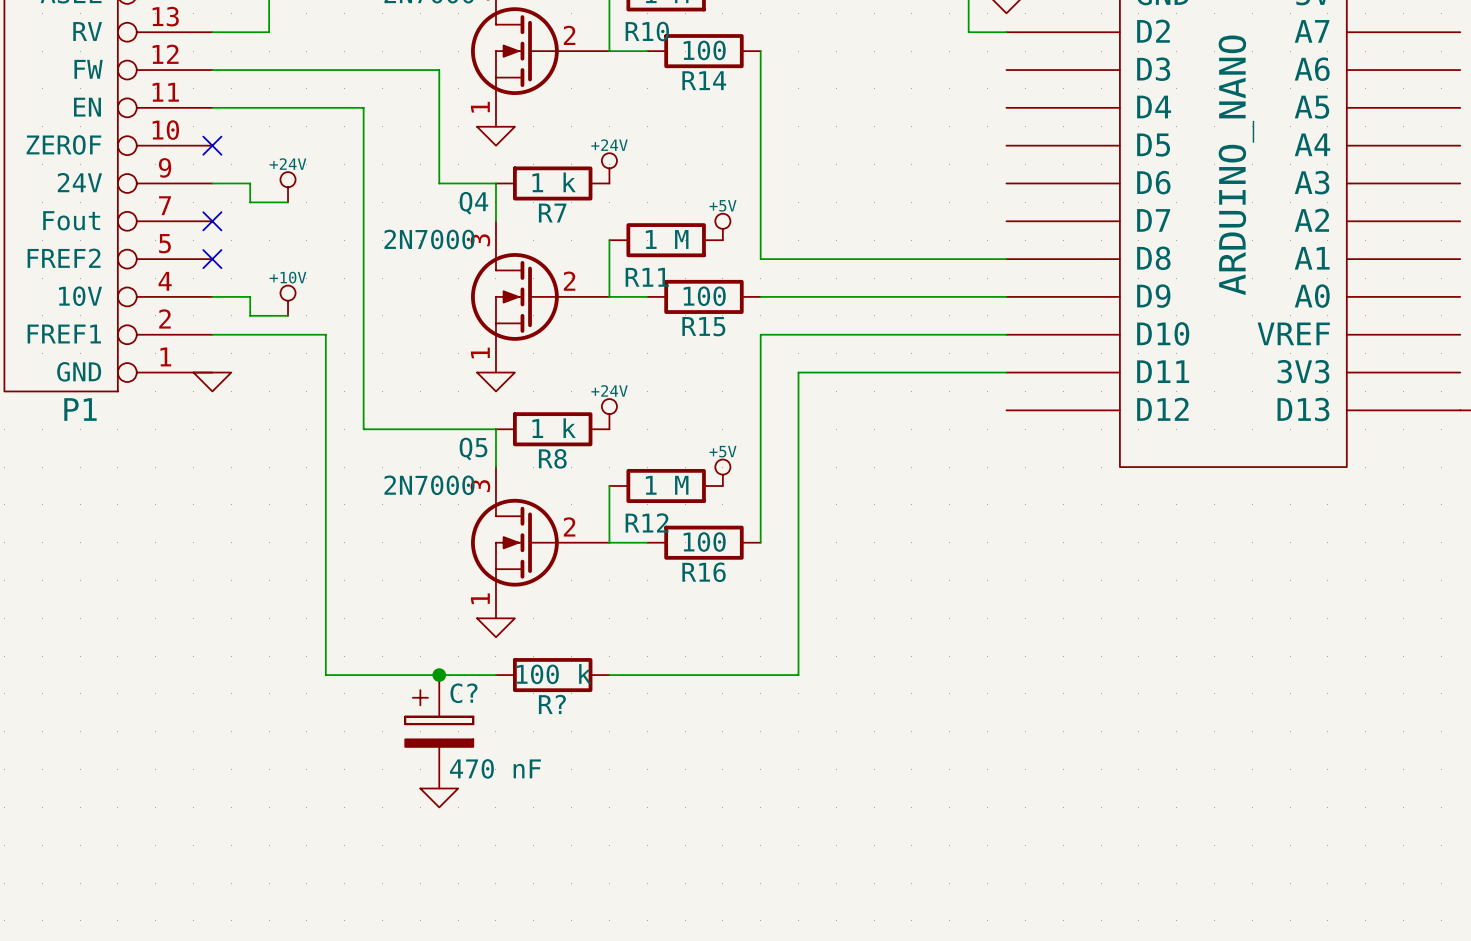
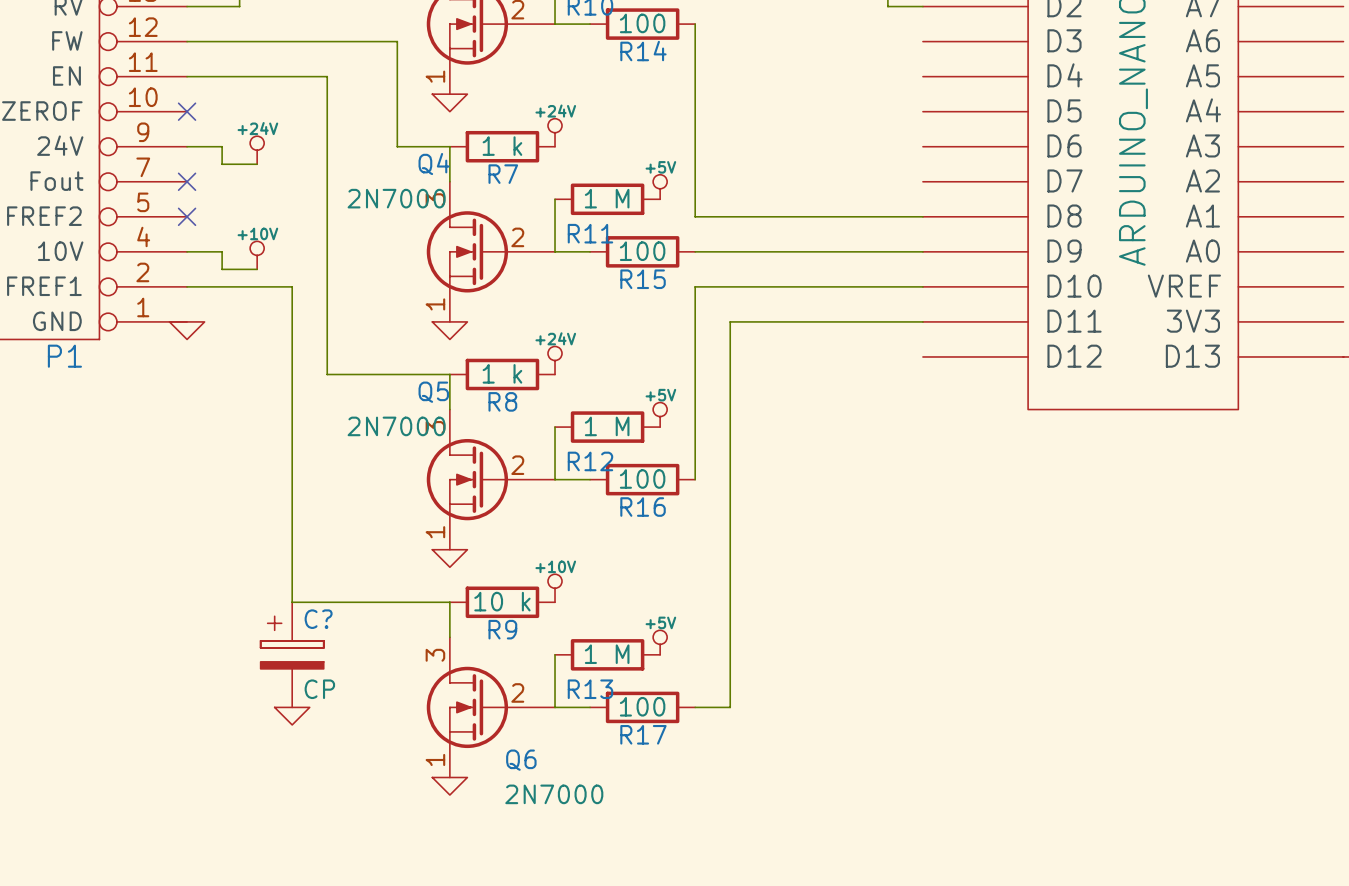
power symbol: none -> +10V (555, 588)
R? value: 100 k (554, 674) -> 10 k (502, 601)
junction: (439, 675) -> none
wire: none -> (449, 602) (449, 637)
wire: (609, 675) (798, 675) -> (695, 707) (730, 707) (730, 602)
R? name: R? (552, 704) -> R9 (502, 629)
power symbol: none -> +5V (660, 642)
C?: none -> CP (292, 654)
C?: 470 nF (439, 731) -> none
wire: none -> (555, 654) (555, 707) (590, 707)
R13: none -> 1 M (607, 654)
Q6: none -> 2N7000 (490, 707)
R17: none -> 100 (642, 707)
power symbol: none -> (292, 716)
power symbol: (439, 797) -> none
power symbol: none -> (449, 786)

